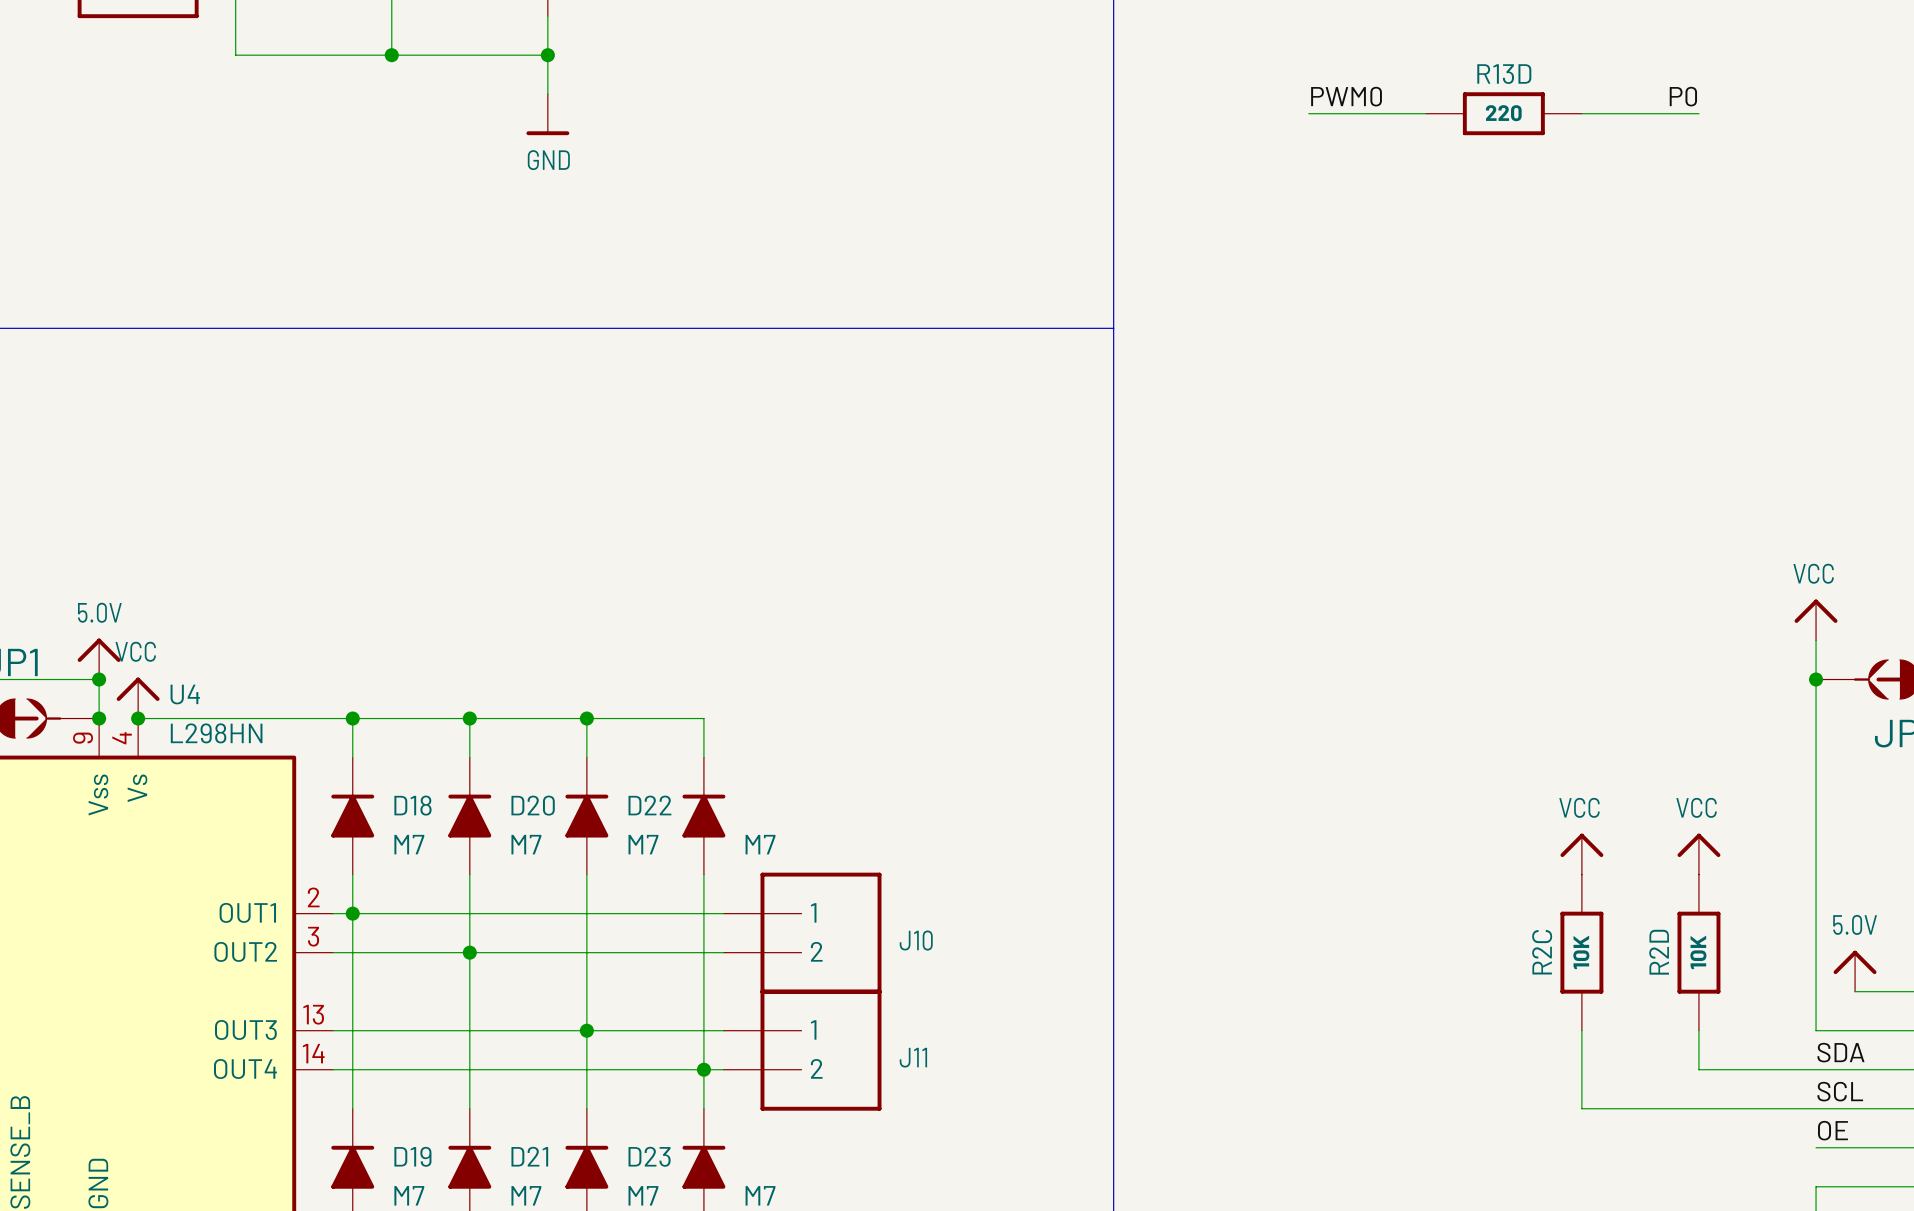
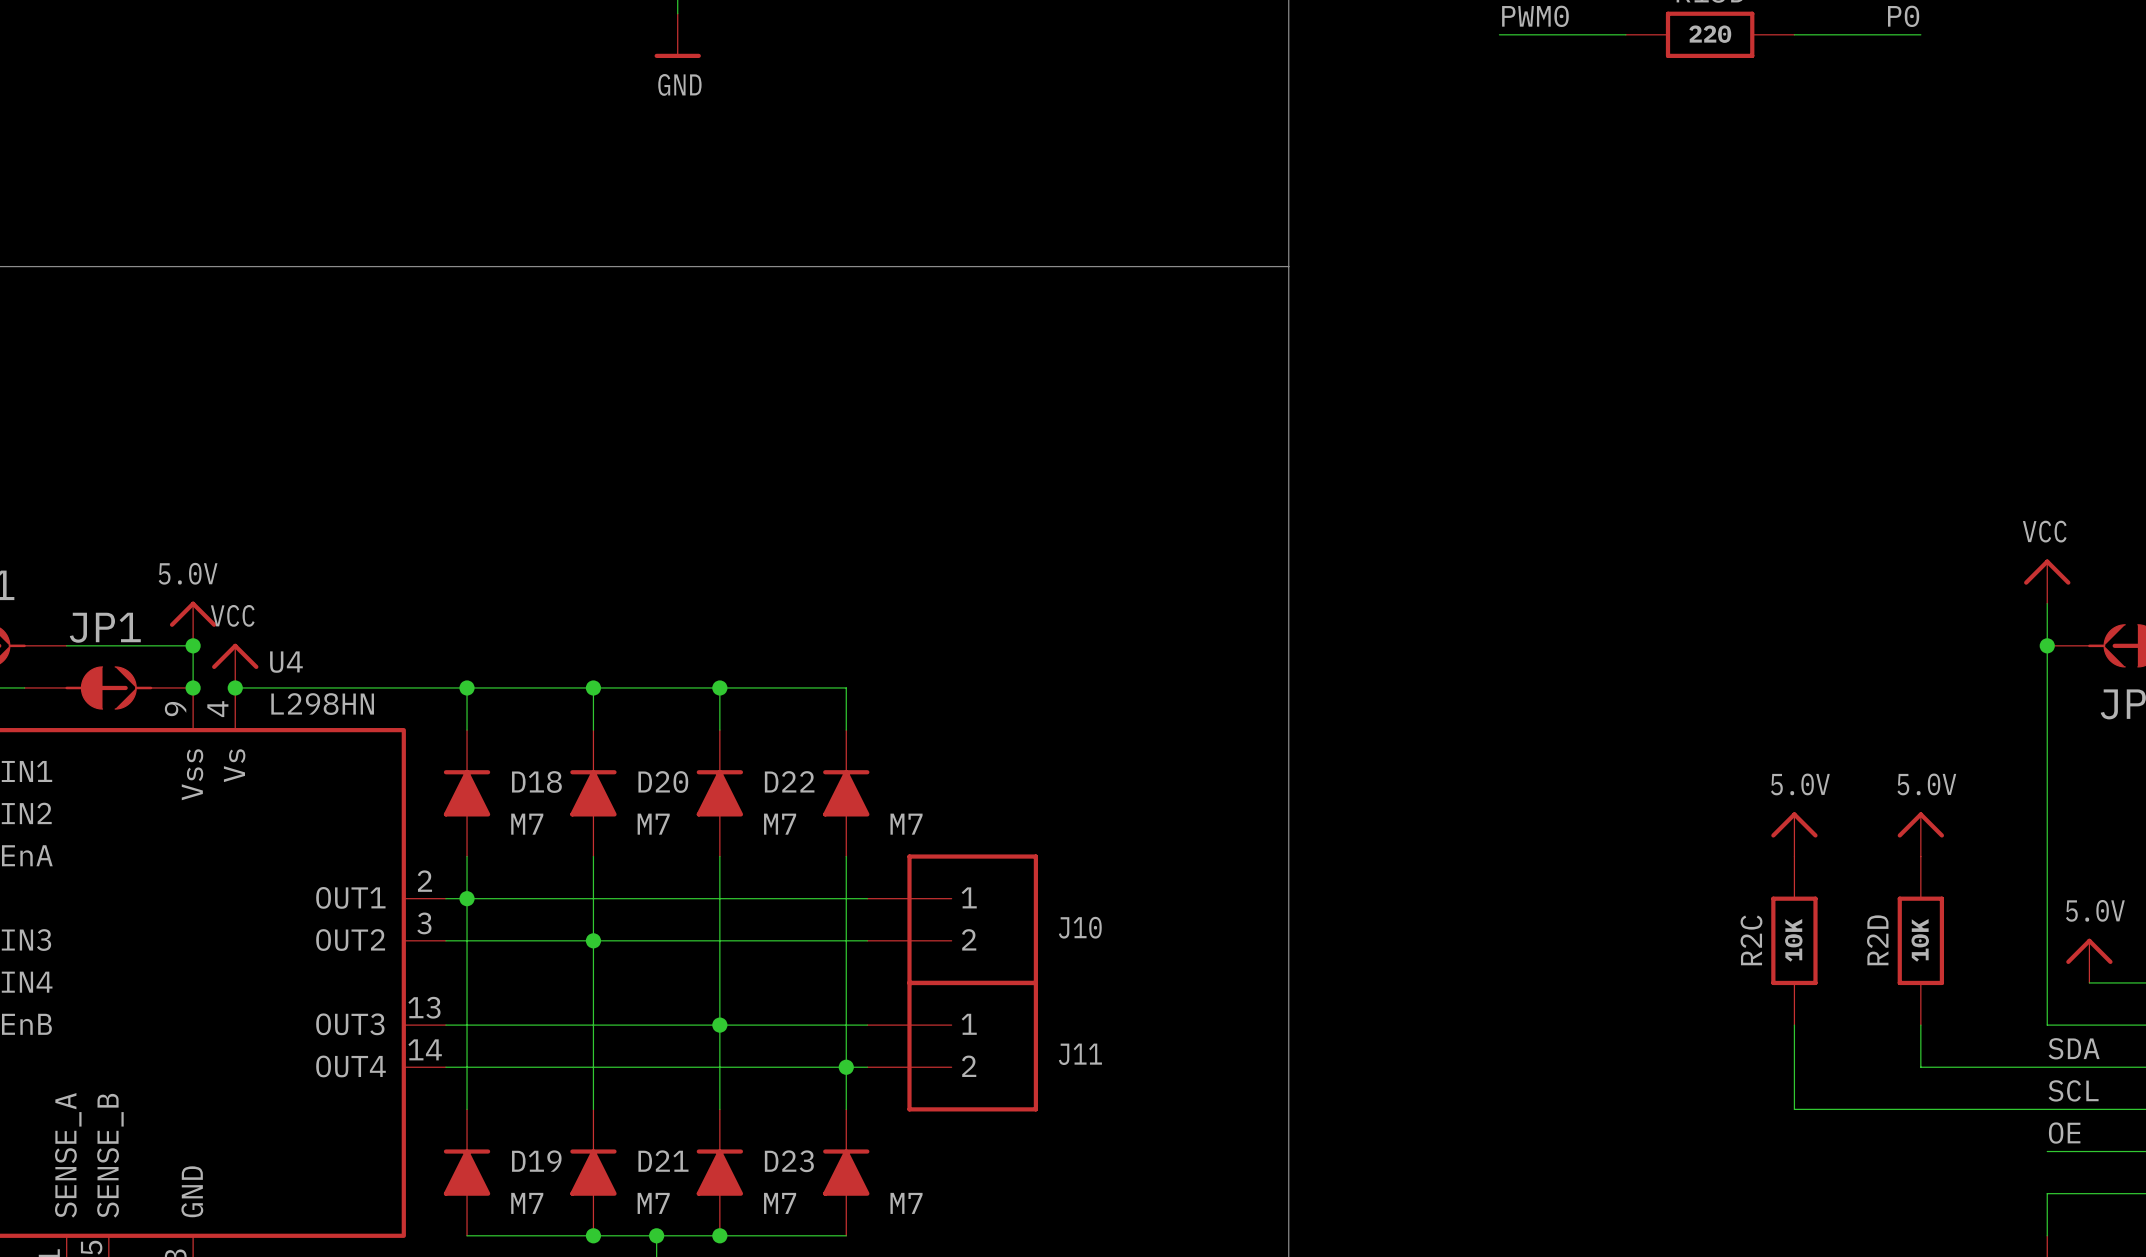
power symbol: VCC (1581, 854) -> 5.0V (1794, 834)
power symbol: VCC (1698, 854) -> 5.0V (1920, 834)

